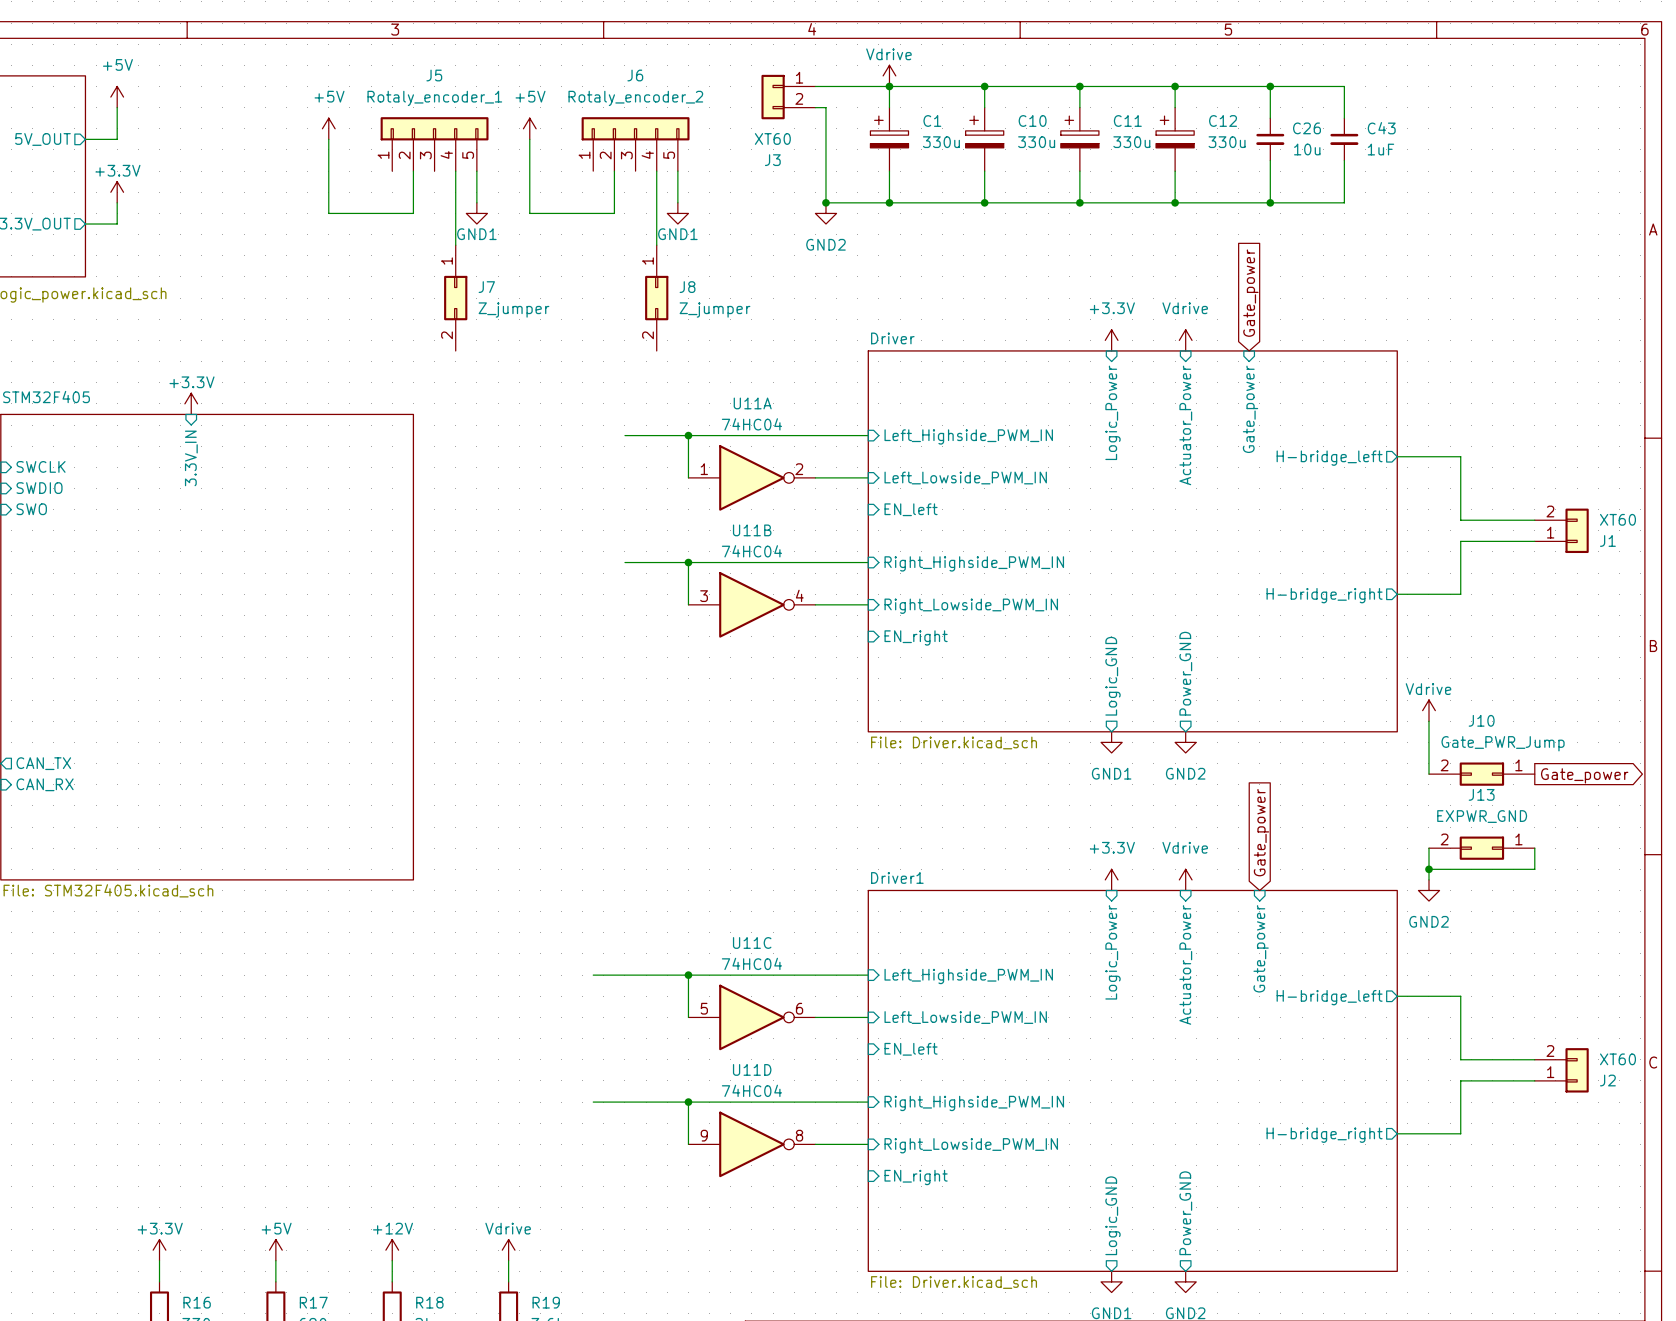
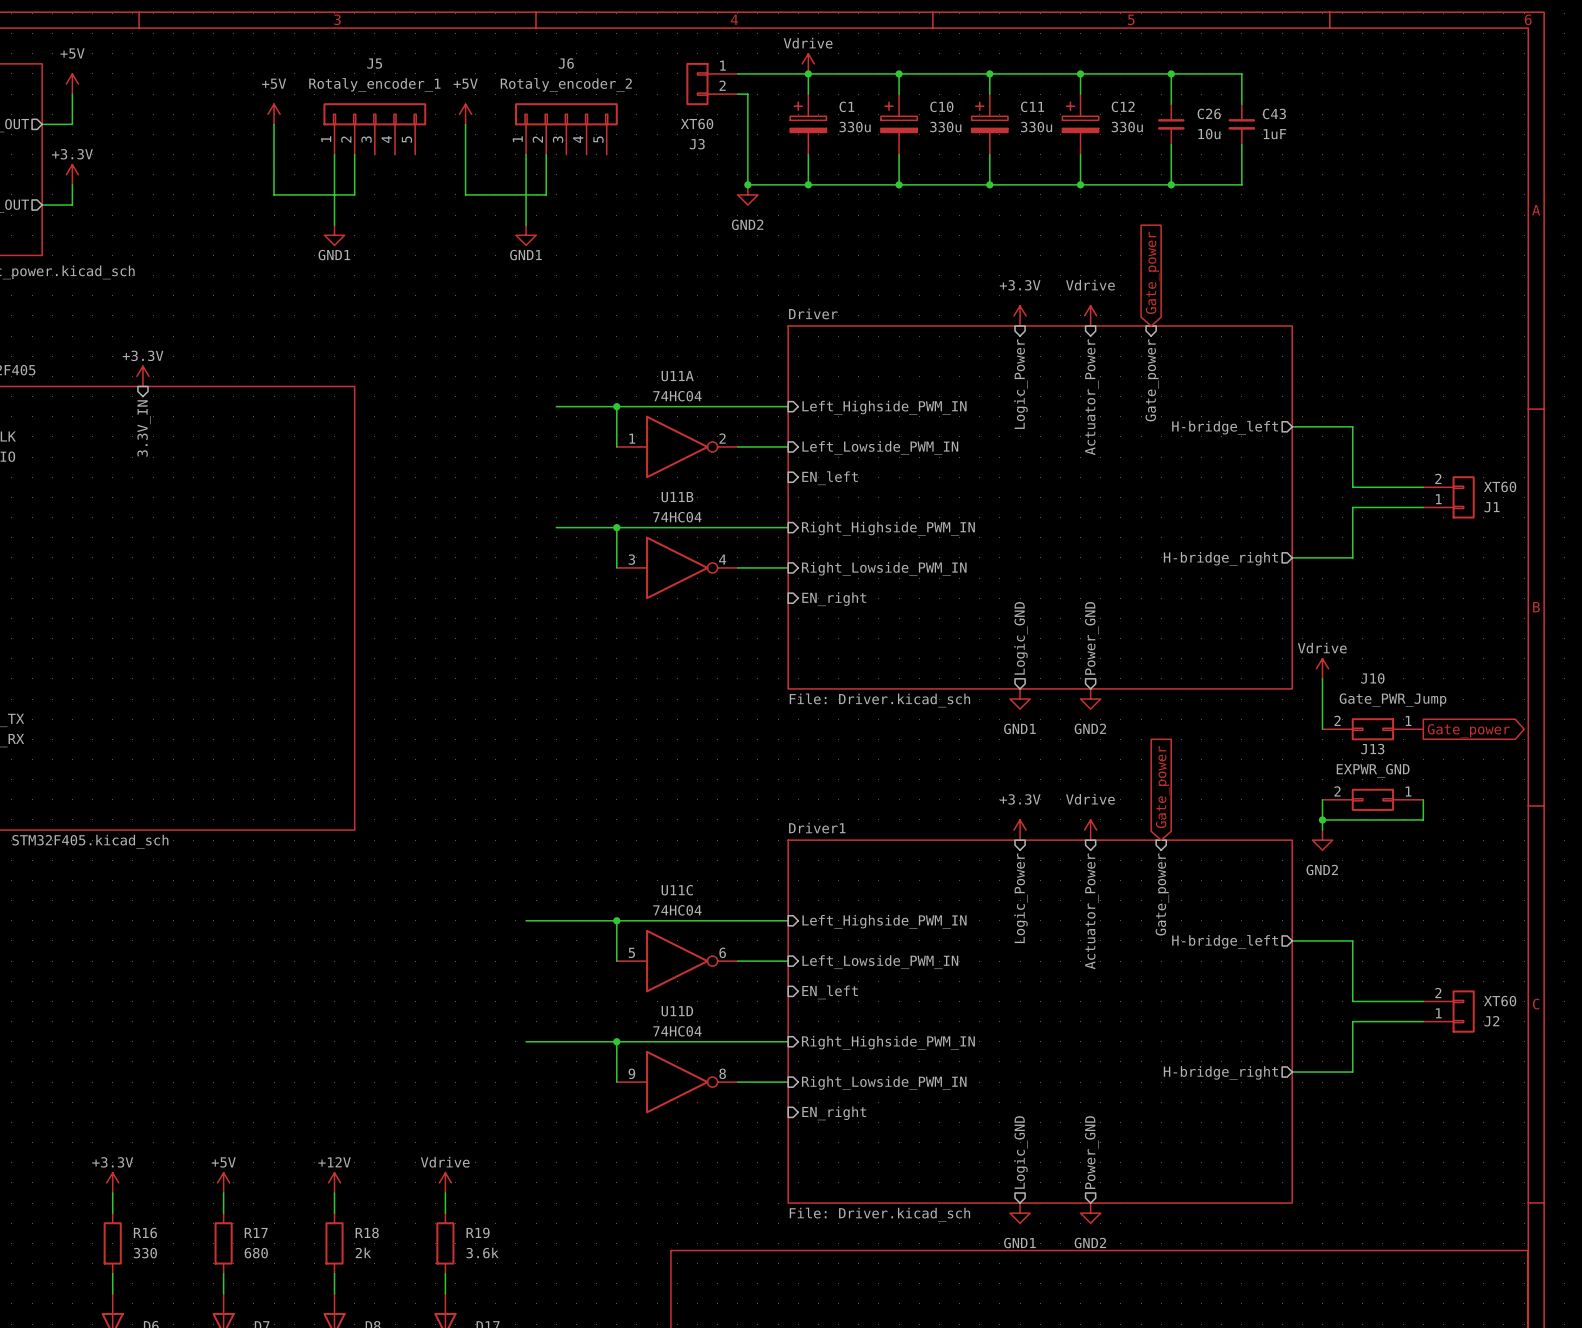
wire: (455, 171) (455, 245) -> (334, 154) (334, 225)
wire: (476, 171) (476, 202) -> none
wire: (656, 171) (656, 245) -> (526, 154) (526, 225)
wire: (677, 171) (677, 202) -> none
power symbol: GND1 (476, 213) -> none
power symbol: GND1 (677, 213) -> none
power symbol: none -> GND1 (334, 235)
power symbol: none -> GND1 (526, 235)
J7: Z_jumper (455, 298) -> none
J8: Z_jumper (656, 298) -> none

